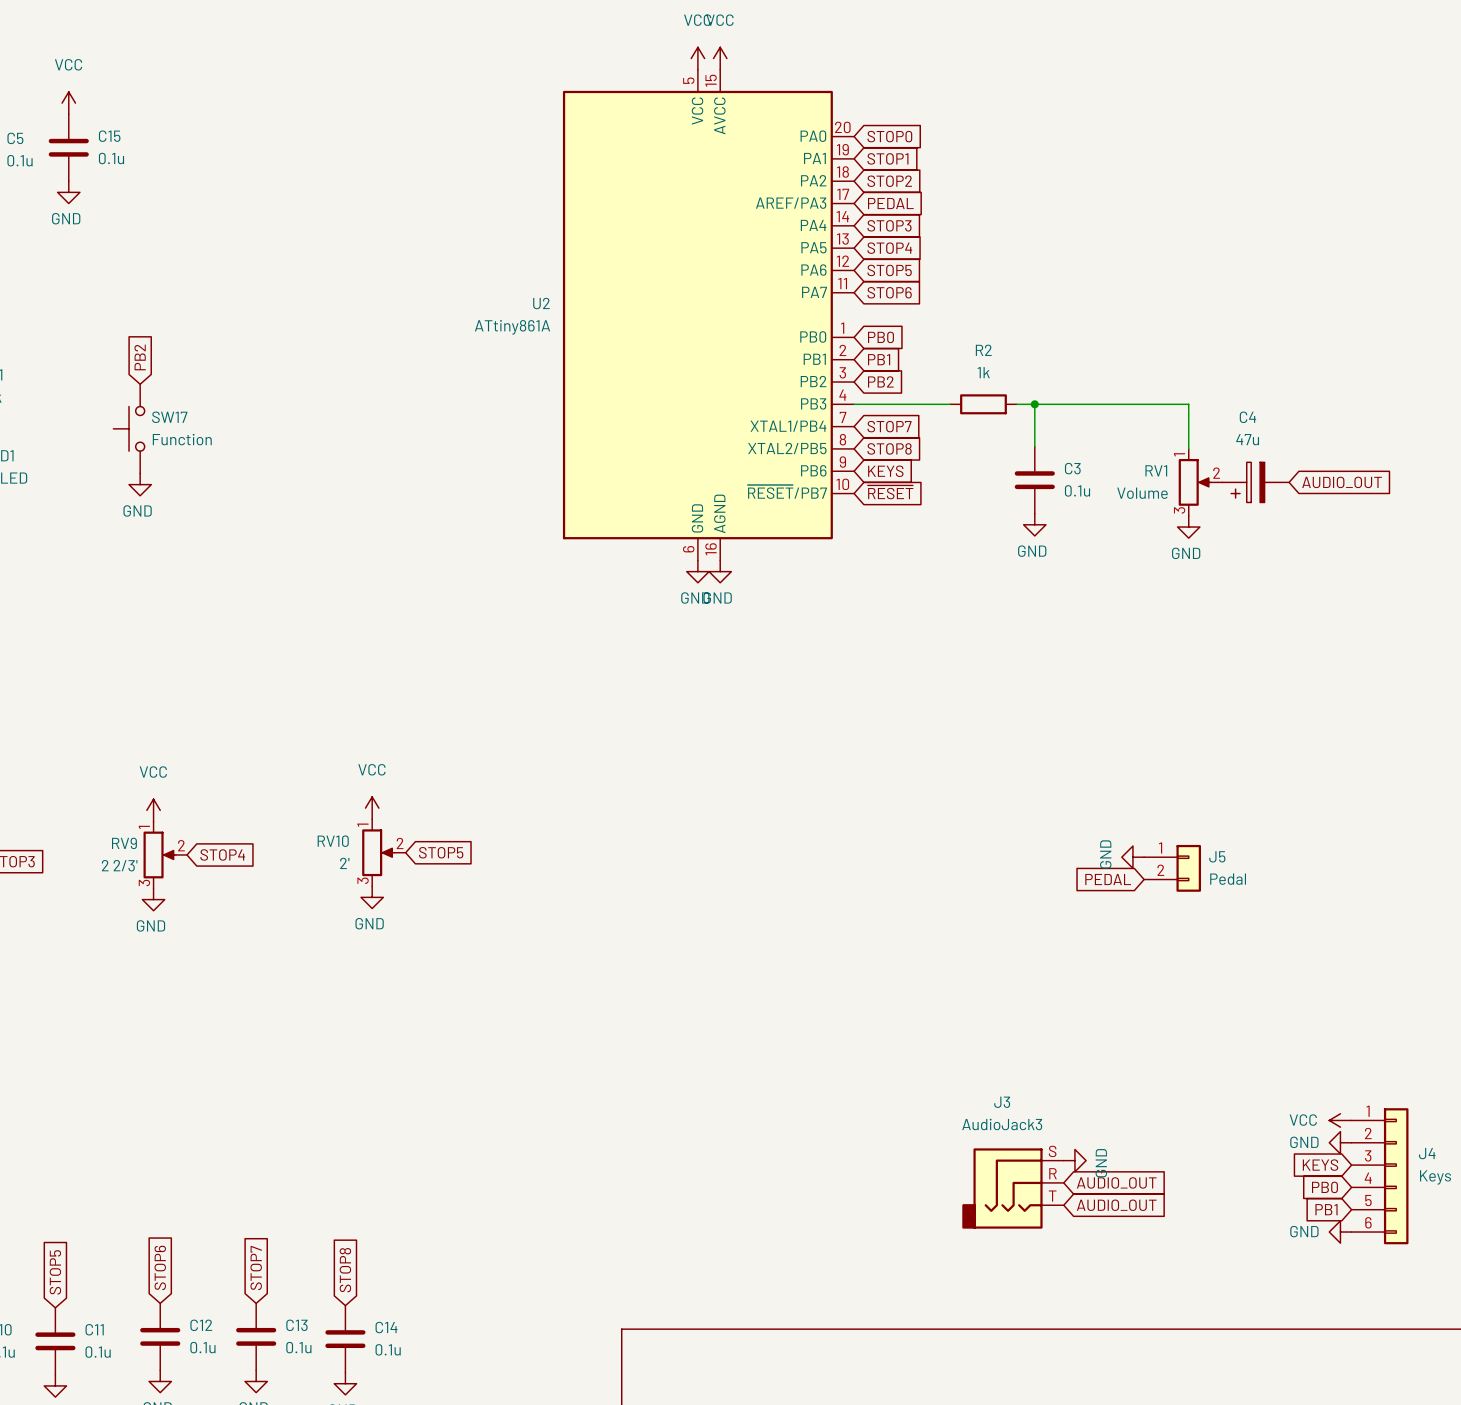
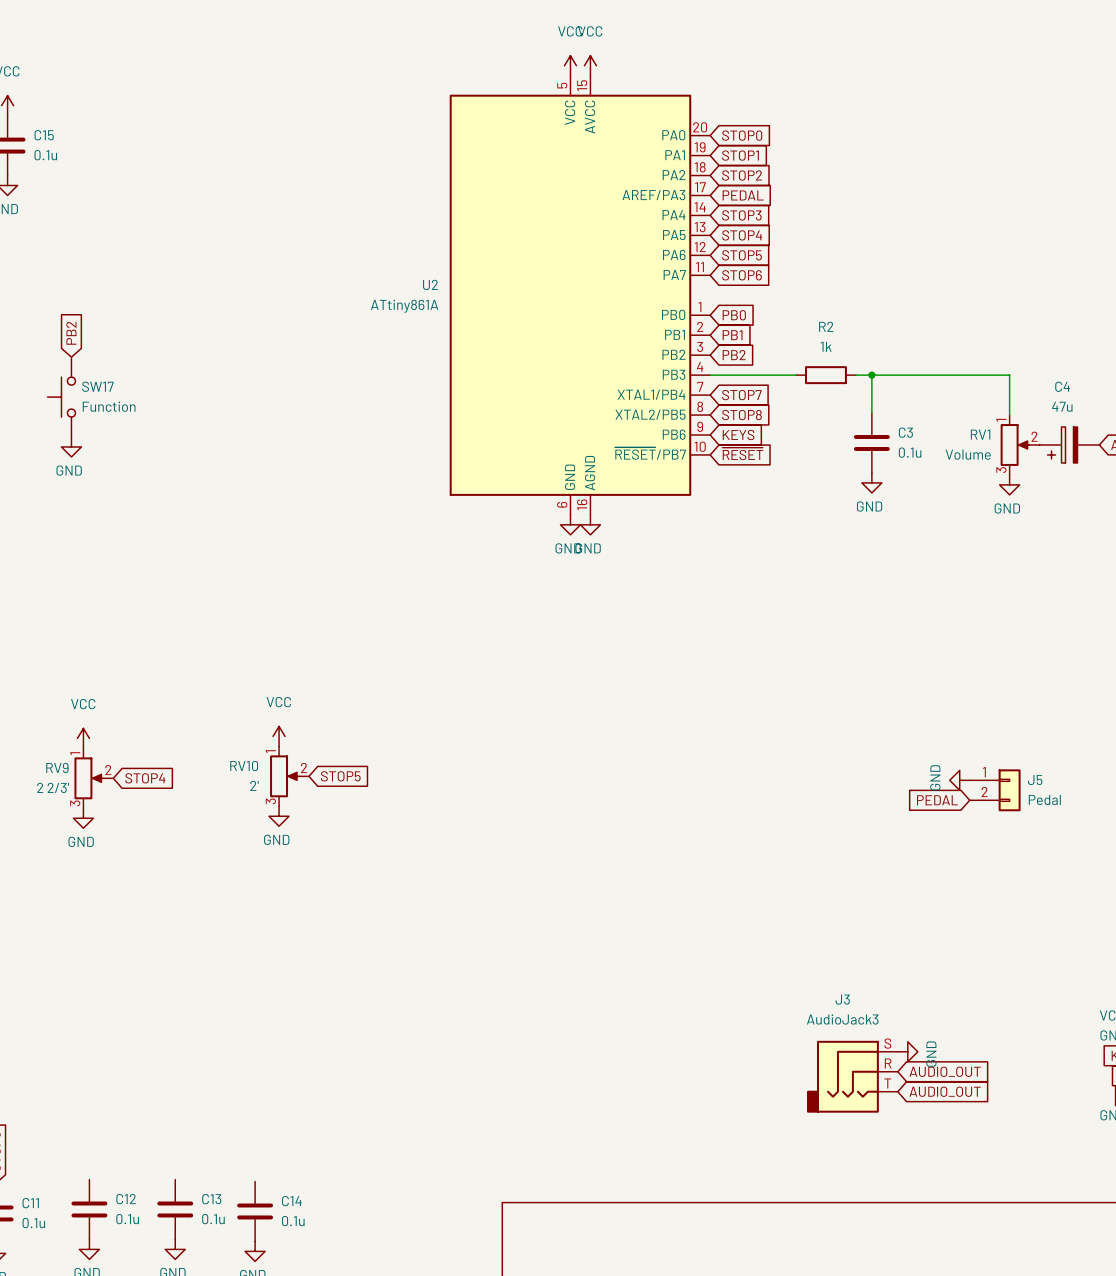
global label: STOP6 (160, 1267) -> none
global label: STOP7 (256, 1267) -> none
global label: STOP8 (345, 1270) -> none

